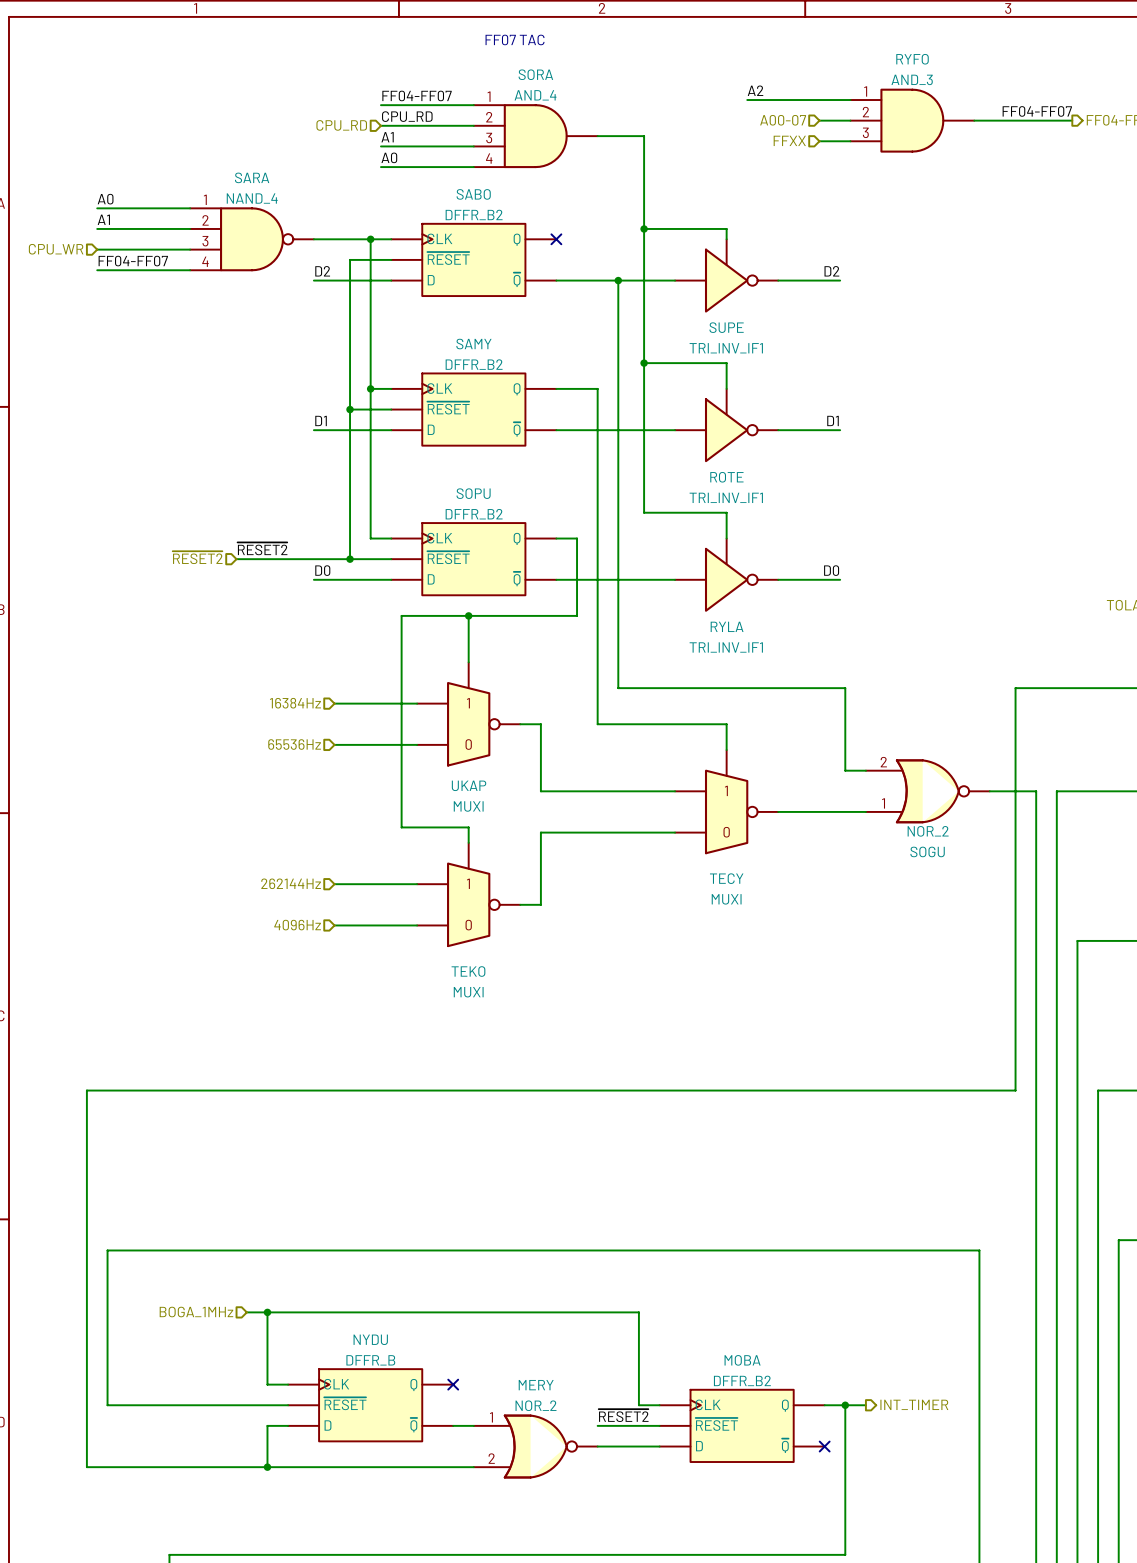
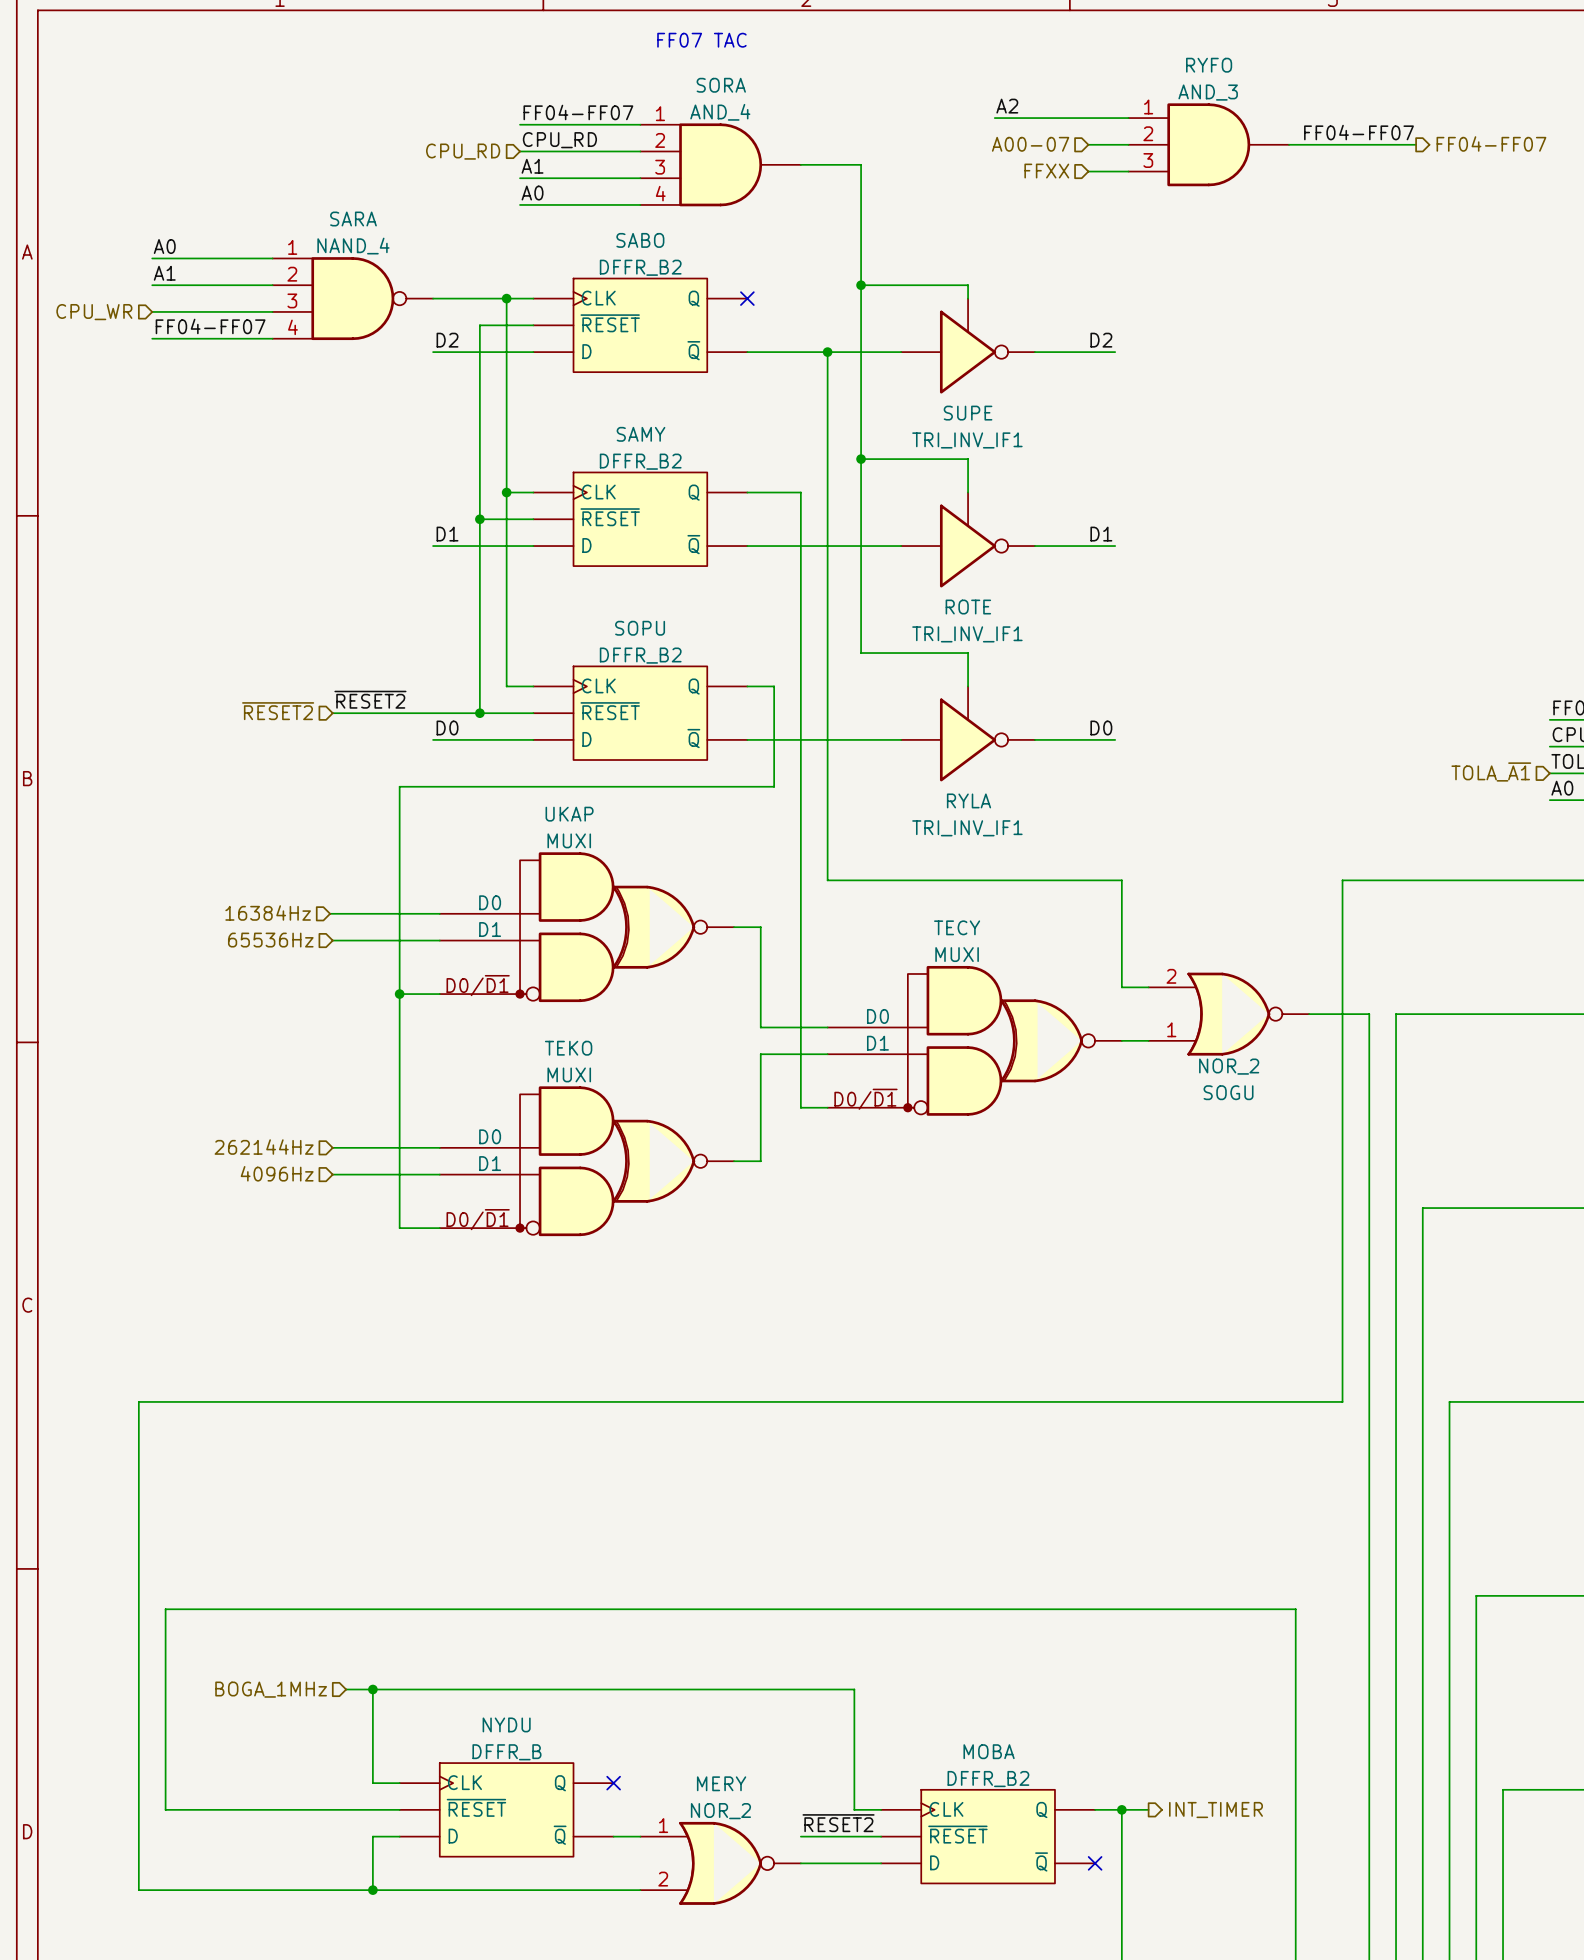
wire: (401, 615) (401, 827) (468, 827) (468, 842) -> (546, 786) (399, 786) (399, 1228) (439, 1228)
wire: (468, 615) (468, 662) -> none
junction: (468, 615) -> none
hierarchical label position: 16384Hz (295, 703) -> 16384Hz (268, 912)
wire: (334, 703) (417, 703) -> none
wire: none -> (330, 913) (439, 913)
UKAP: MUXI (468, 714) -> none
UKAP: none -> MUXI (586, 927)
wire: (520, 724) (540, 724) (540, 791) (675, 791) -> none
wire: none -> (734, 927) (760, 927) (760, 1027) (827, 1027)
wire: (597, 724) (726, 724) (726, 750) -> (800, 927) (800, 1107) (827, 1107)
hierarchical label position: 65536Hz (294, 744) -> 65536Hz (270, 940)
wire: (334, 744) (417, 744) -> (332, 940) (439, 940)
wire: none -> (399, 994) (439, 994)
junction: none -> (399, 994)
TECY: MUXI (726, 802) -> none
TECY: none -> MUXI (974, 1040)
wire: (778, 811) (845, 811) -> none
wire: none -> (827, 1054) (760, 1054) (760, 1161) (734, 1161)
wire: (675, 832) (540, 832) (540, 904) (520, 904) -> none
hierarchical label position: 262144Hz (291, 883) -> 262144Hz (264, 1147)
wire: (334, 884) (417, 884) -> (332, 1147) (439, 1147)
TEKO: MUXI (468, 895) -> none
TEKO: none -> MUXI (586, 1161)
hierarchical label position: 4096Hz (297, 925) -> 4096Hz (277, 1173)
wire: (334, 925) (417, 925) -> (332, 1174) (439, 1174)

